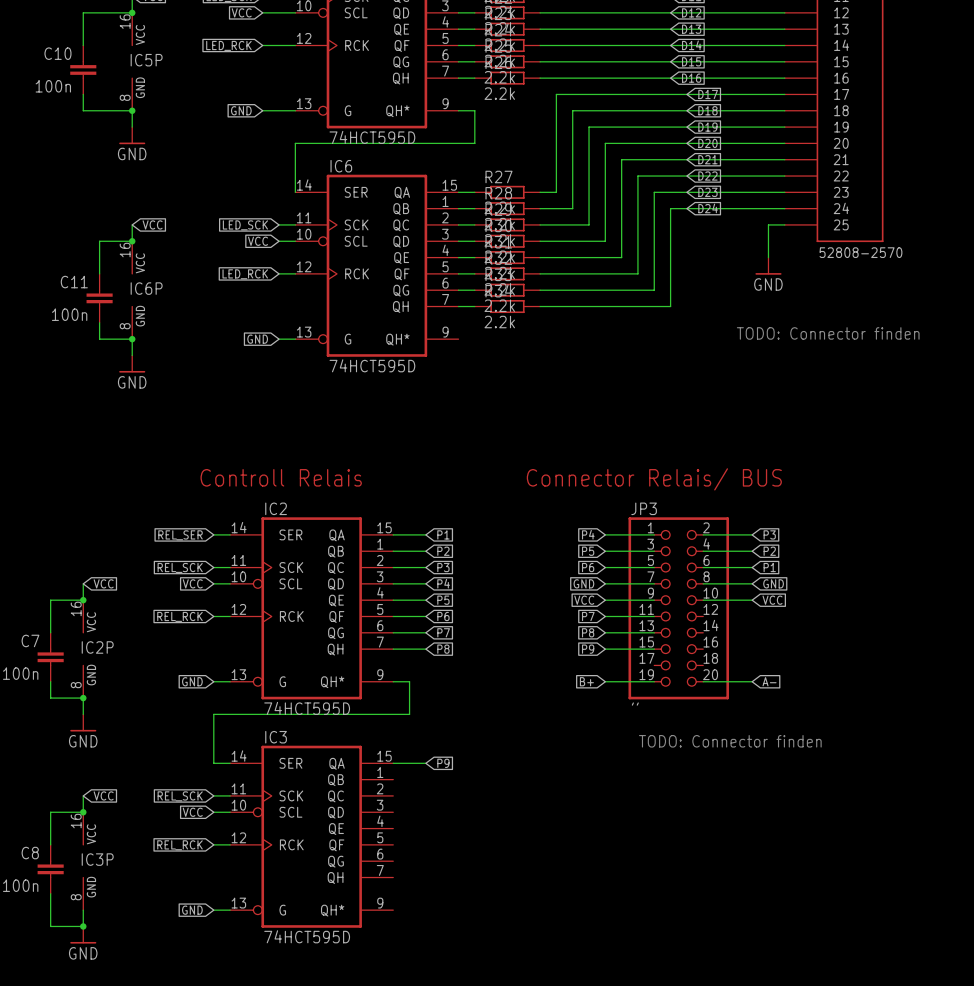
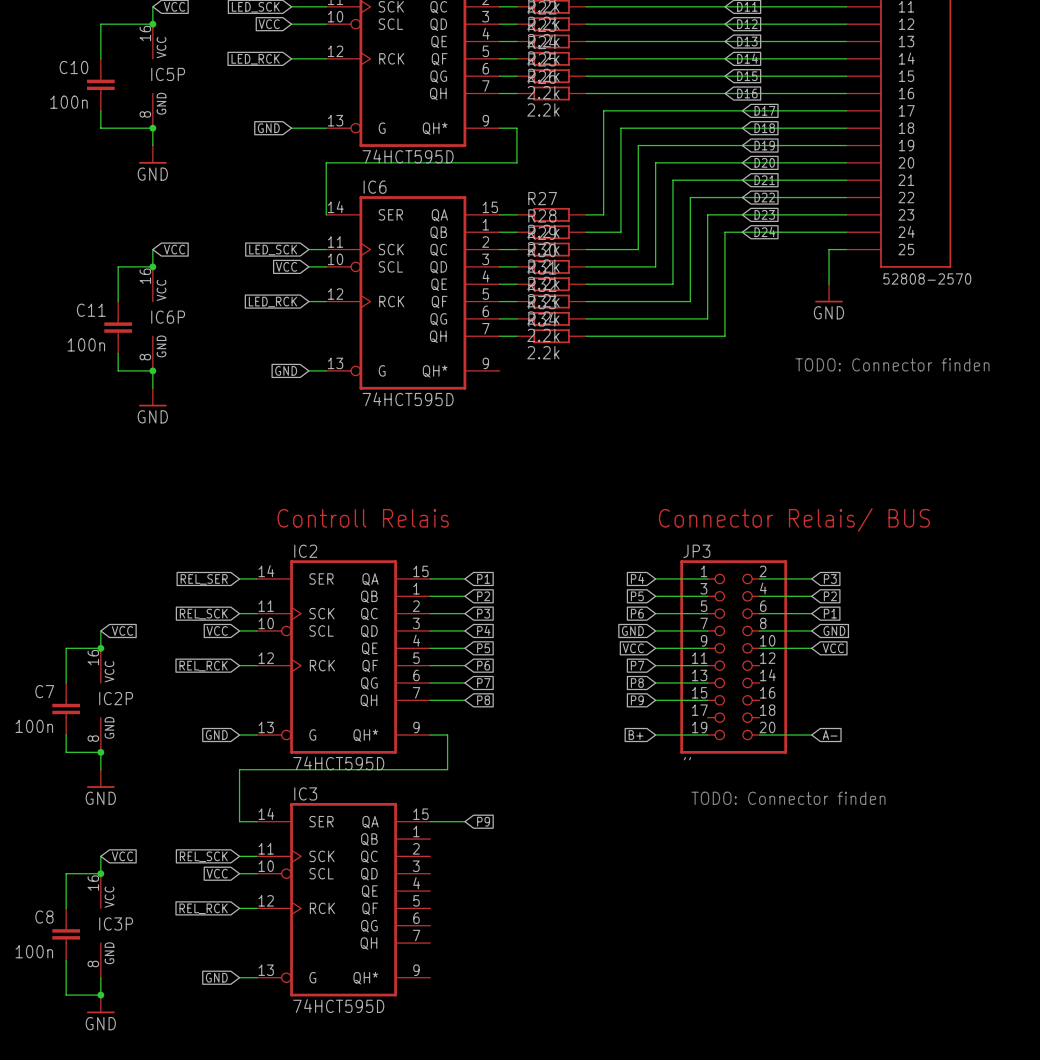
text position: Controll Relais (281, 477) -> Controll Relais (363, 518)
text position: Connector Relais/ BUS (654, 479) -> Connector Relais/ BUS (794, 519)

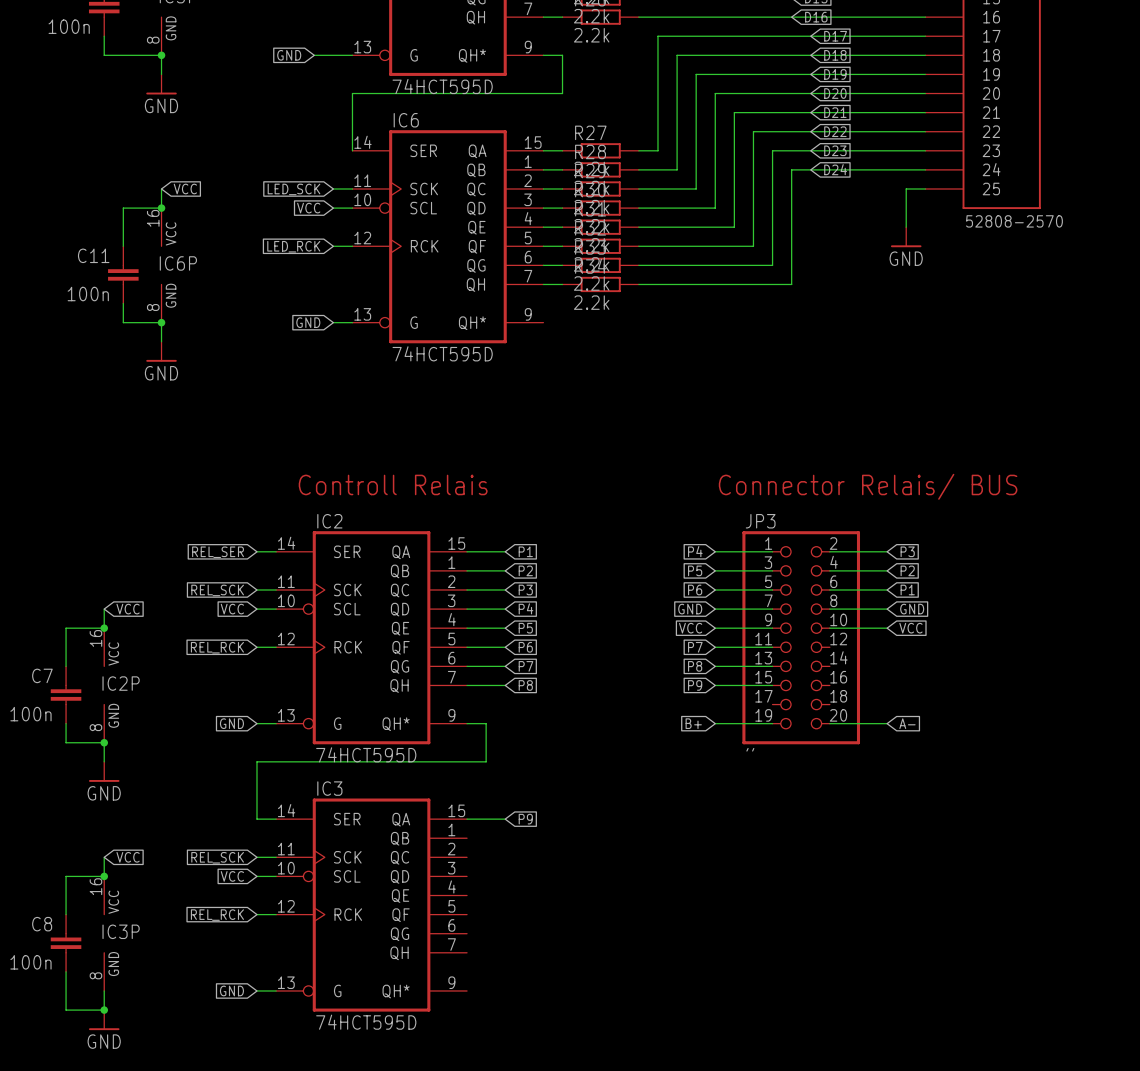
text: TODO: Connector finden (892, 364) -> none
text: TODO: Connector finden (788, 798) -> none

